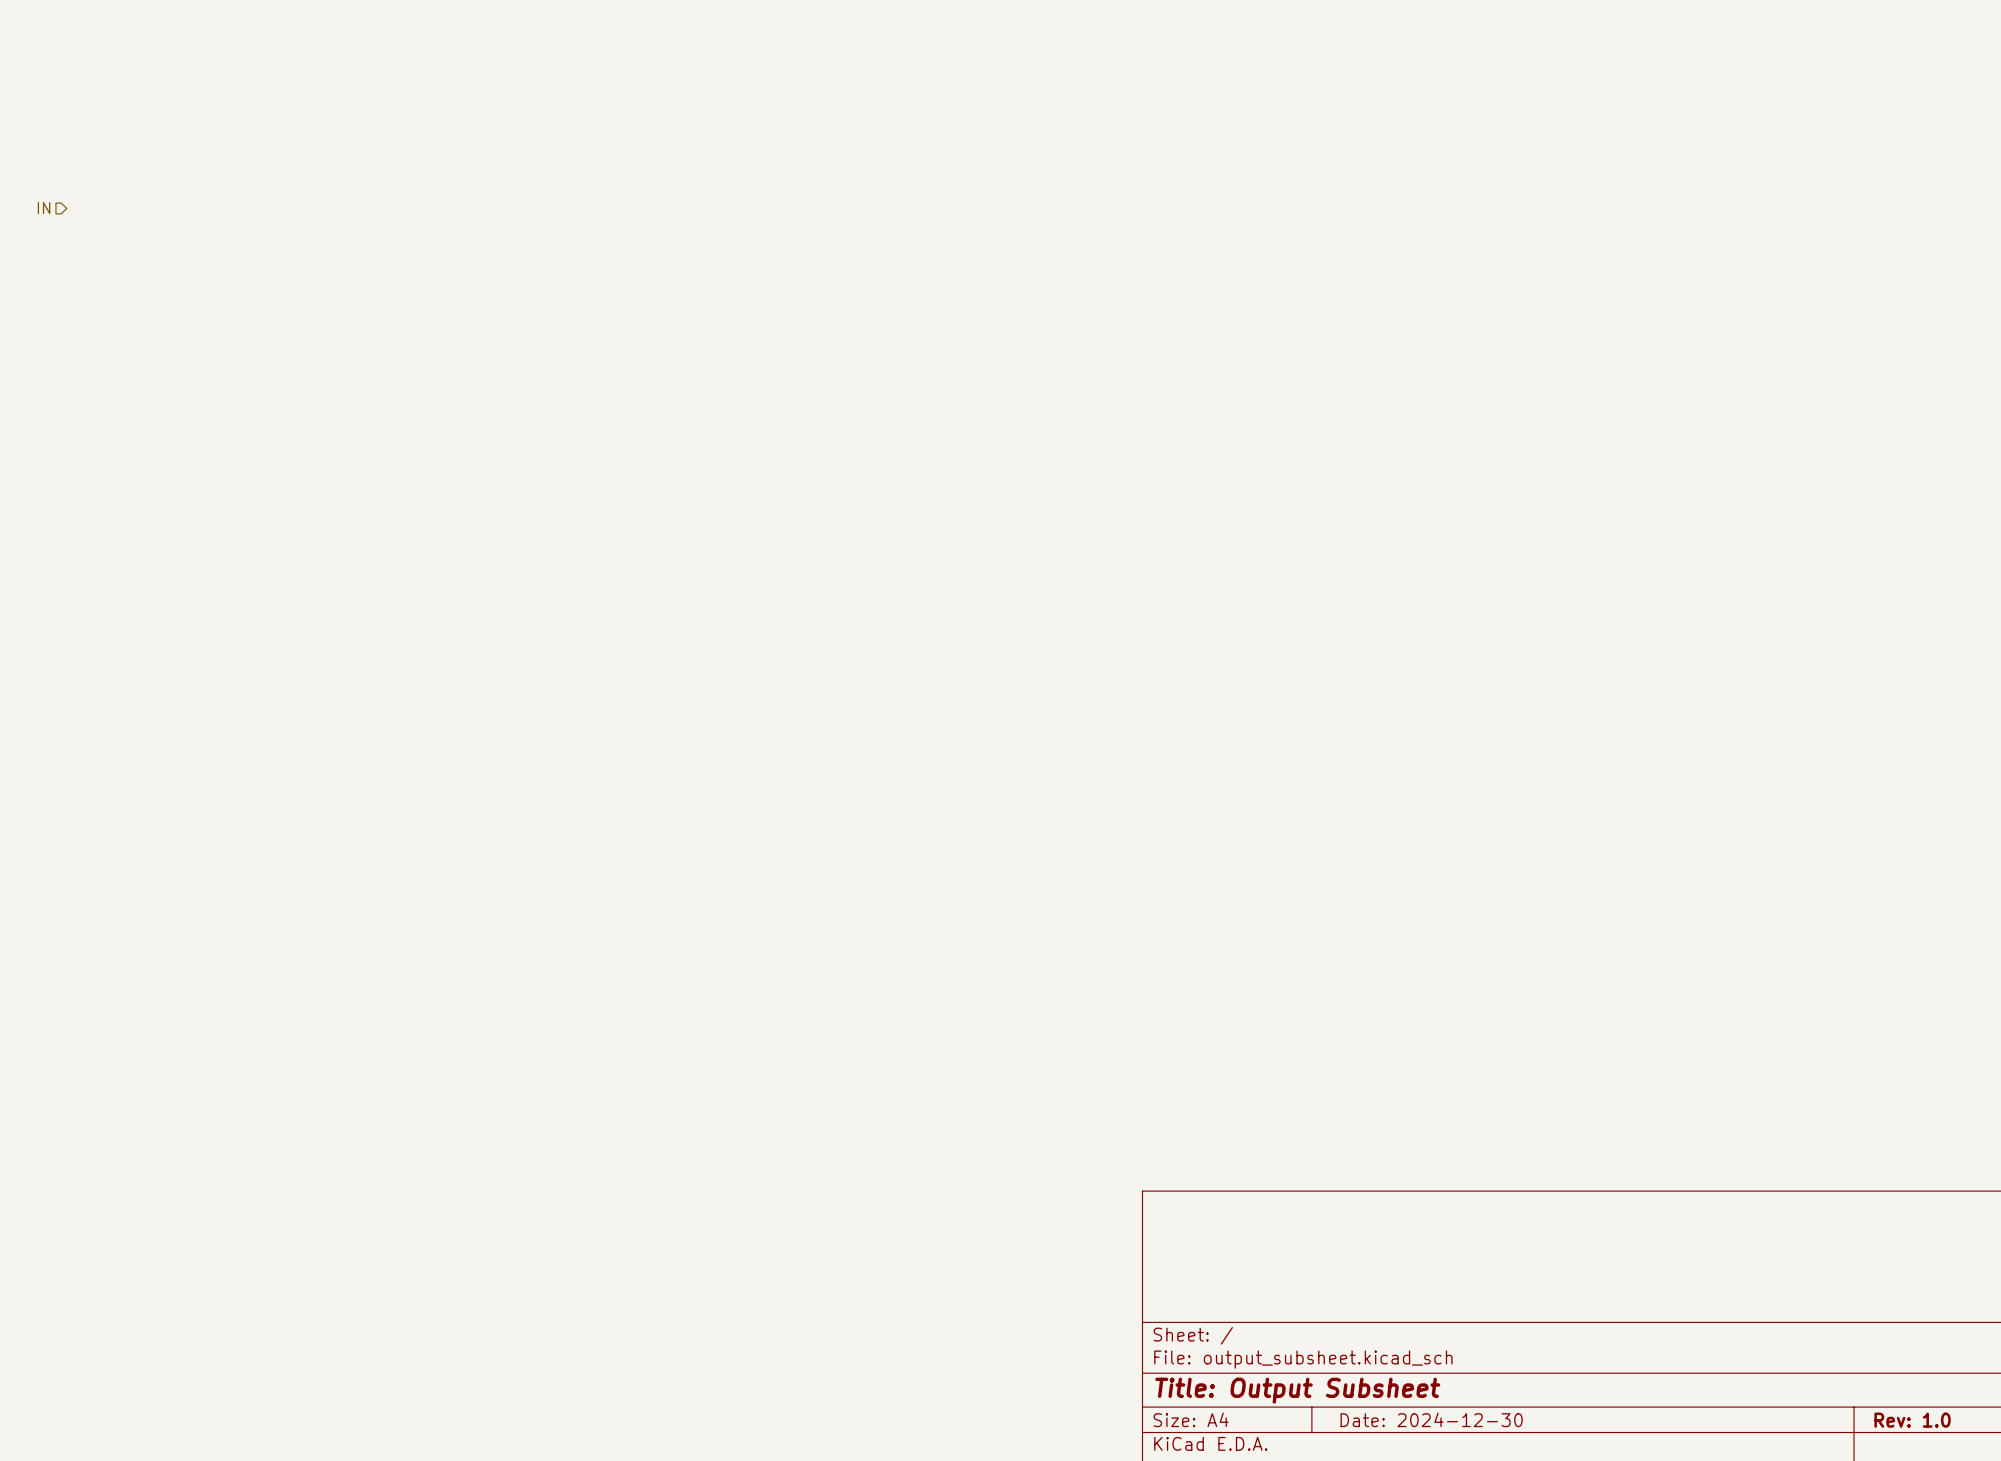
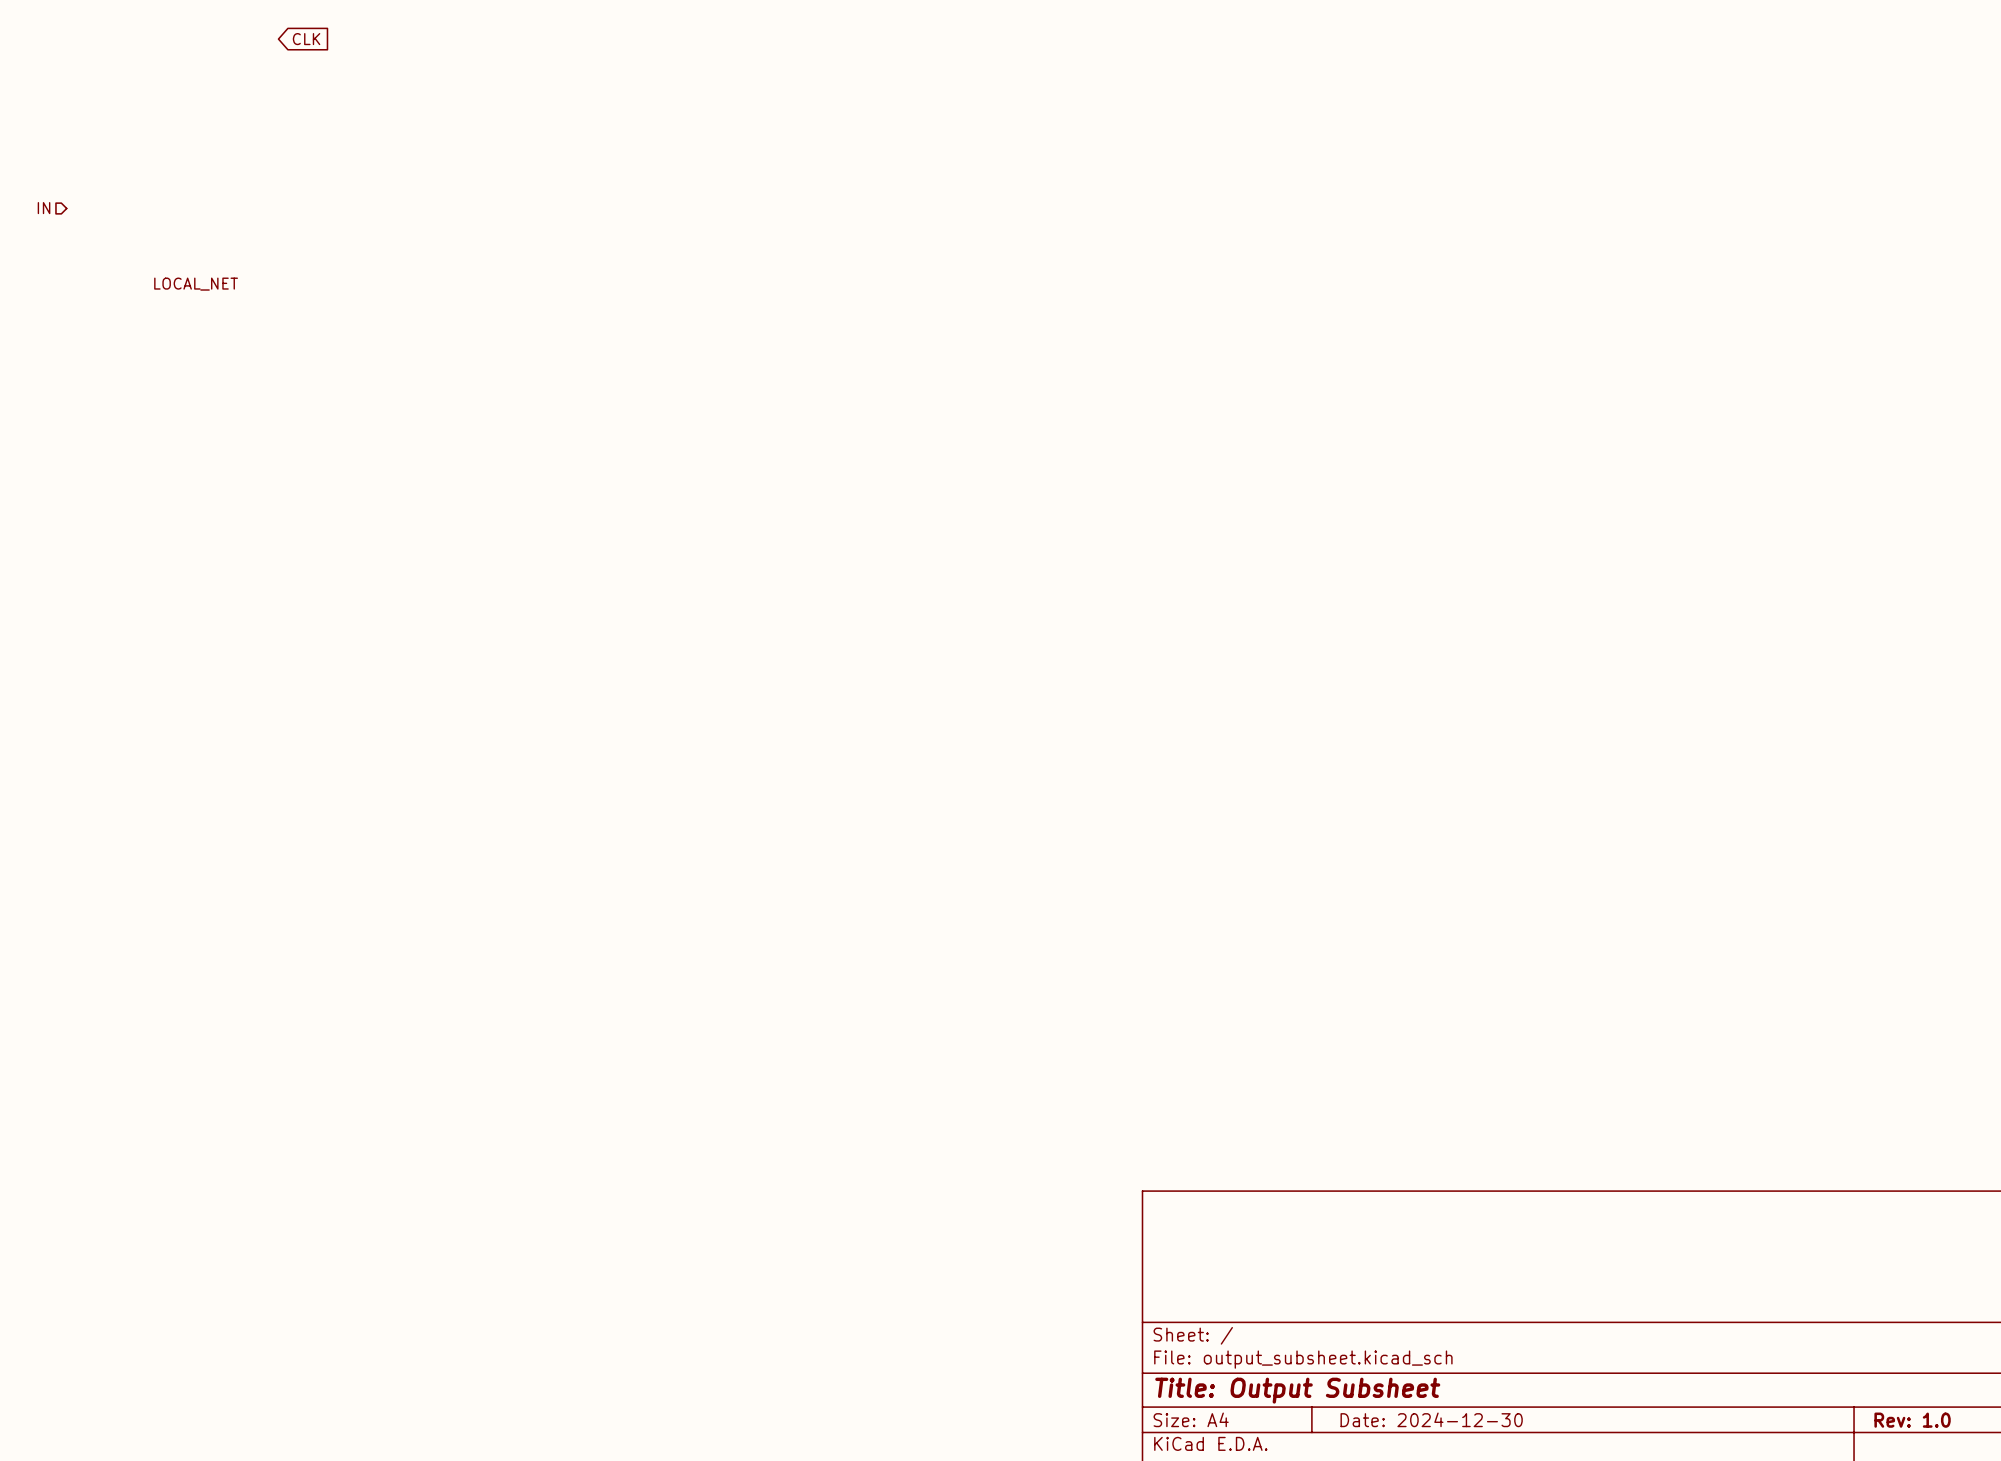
global label: none -> CLK (306, 39)
label: none -> LOCAL_NET (196, 284)

